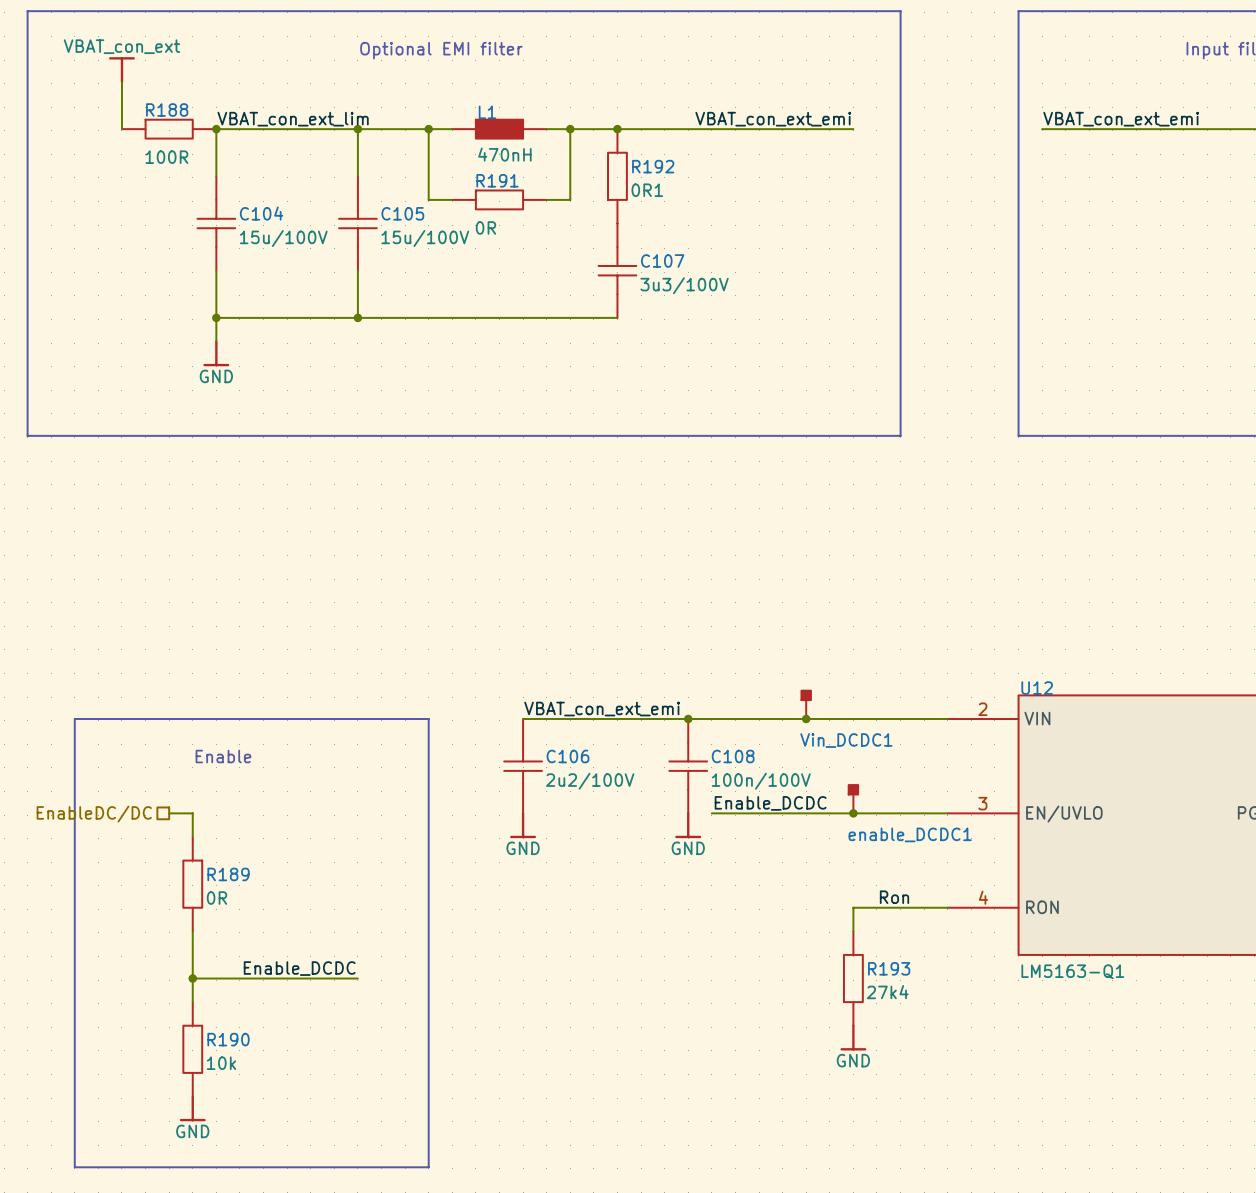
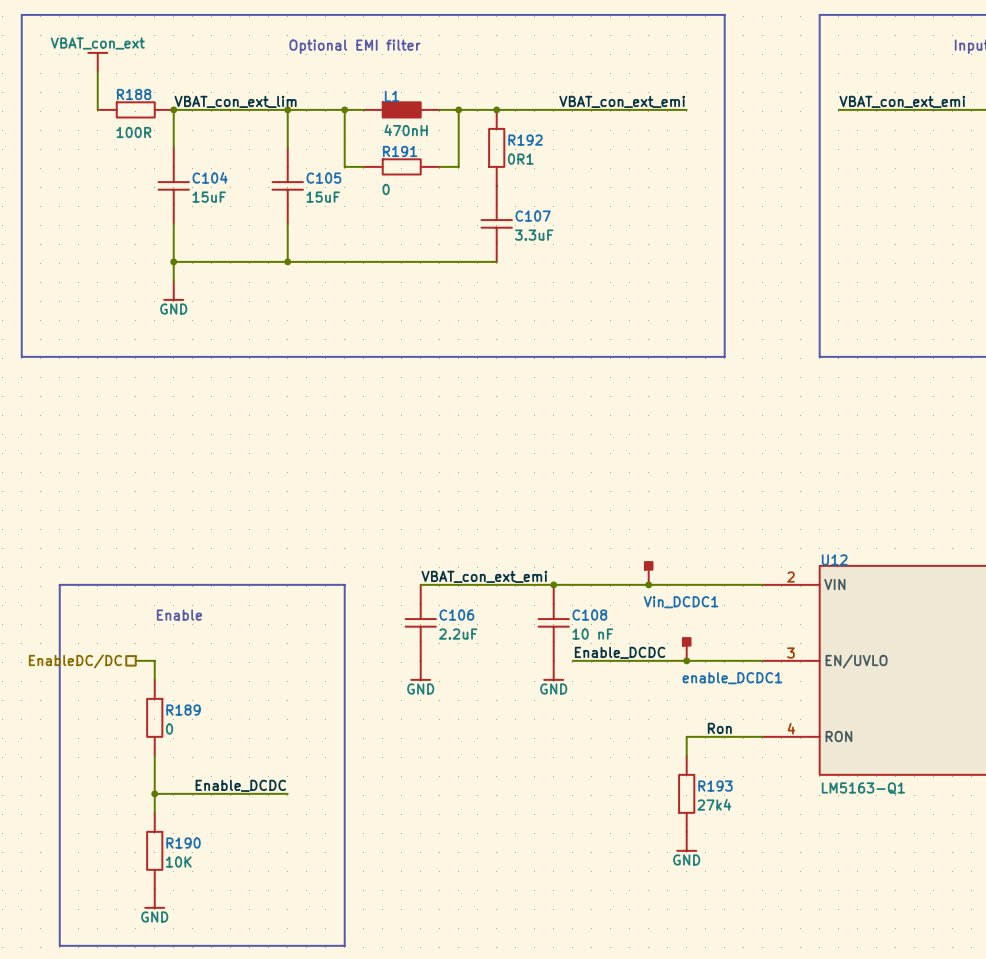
R191 value: 0R (485, 227) -> 0 (386, 189)
C104 value: 15u/100V (283, 238) -> 15uF (209, 197)
C105 value: 15u/100V (425, 238) -> 15uF (323, 197)
C107 value: 3u3/100V (684, 285) -> 3.3uF (534, 235)
C106 value: 2u2/100V (590, 781) -> 2.2uF (458, 634)
C108 value: 100n/100V (761, 781) -> 10 nF (592, 634)
R189 value: 0R (217, 898) -> 0 (169, 729)
R190 value: 10k (221, 1063) -> 10K (178, 862)

